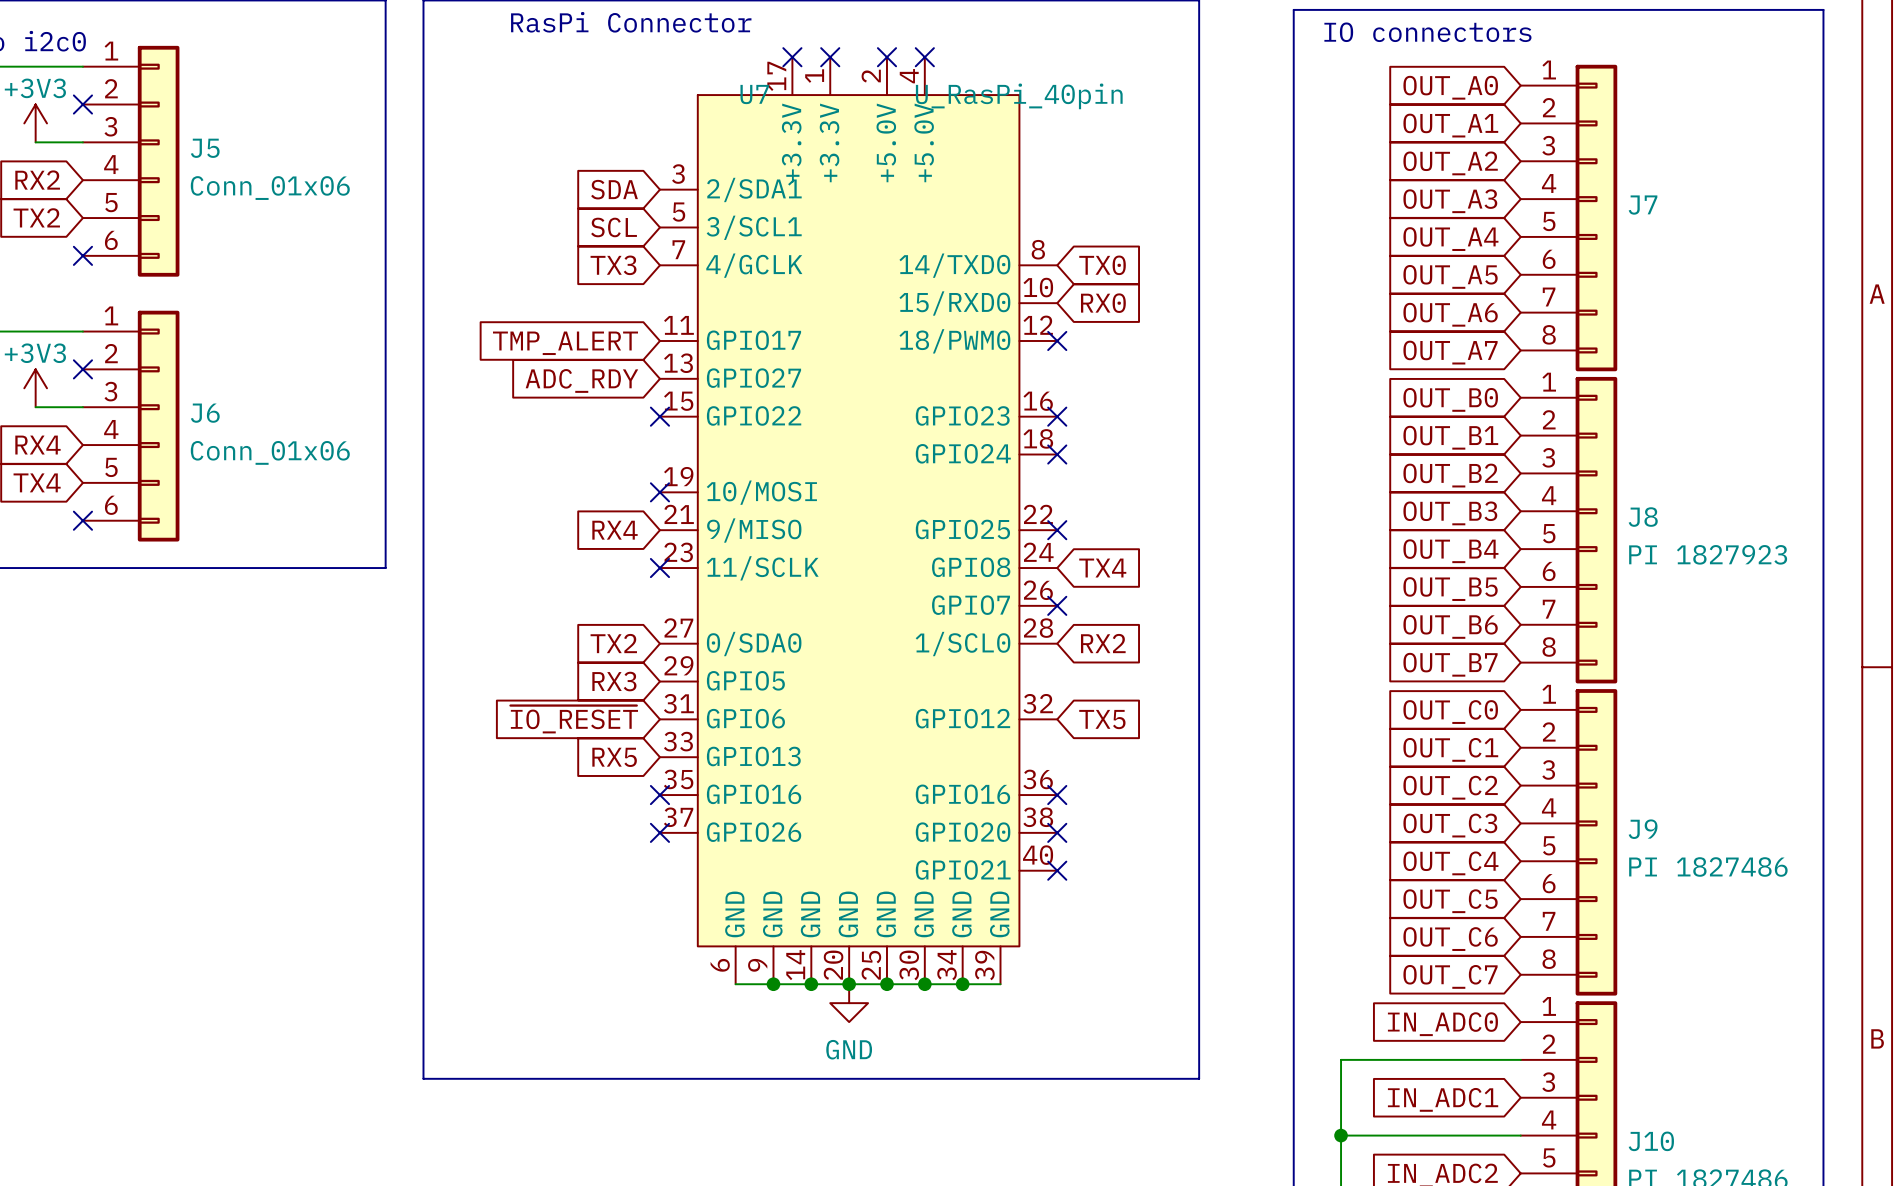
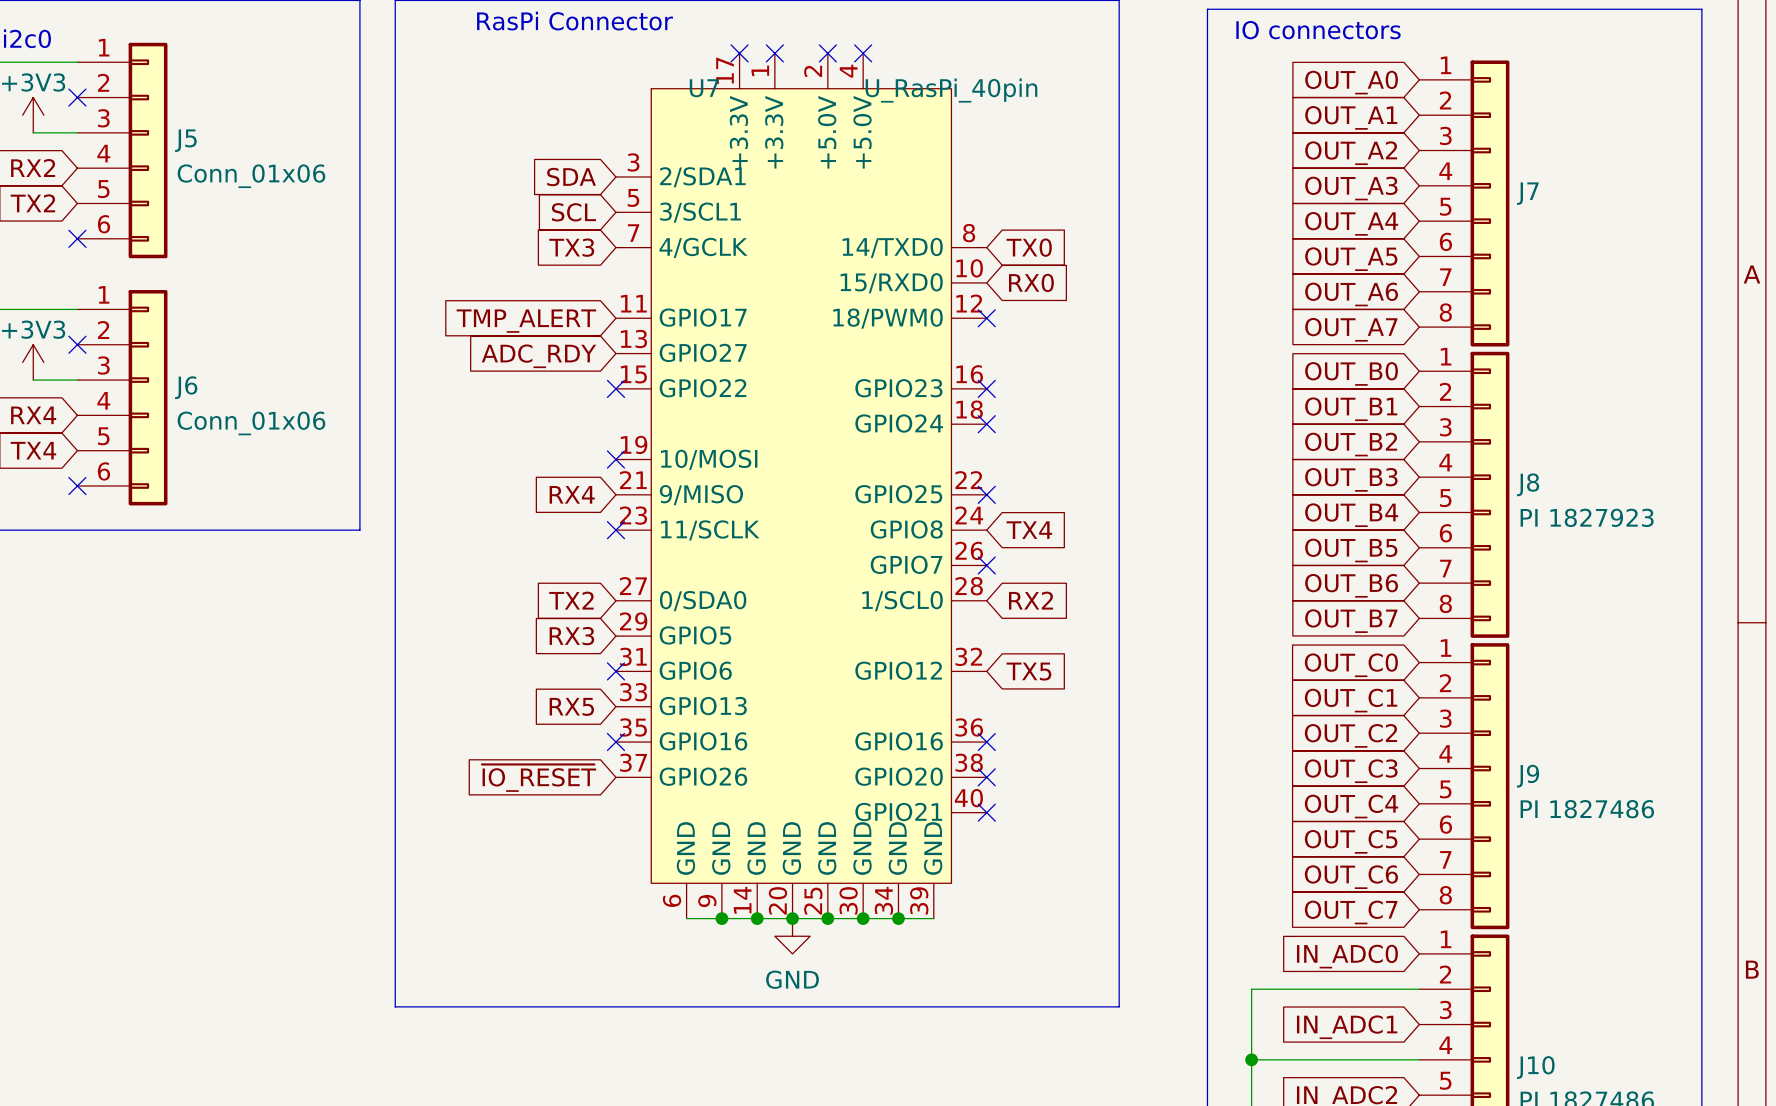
global label position: ~{IO_RESET} (574, 719) -> ~{IO_RESET} (539, 778)
no-connect mark: none -> (615, 671)
no-connect mark: (659, 832) -> none

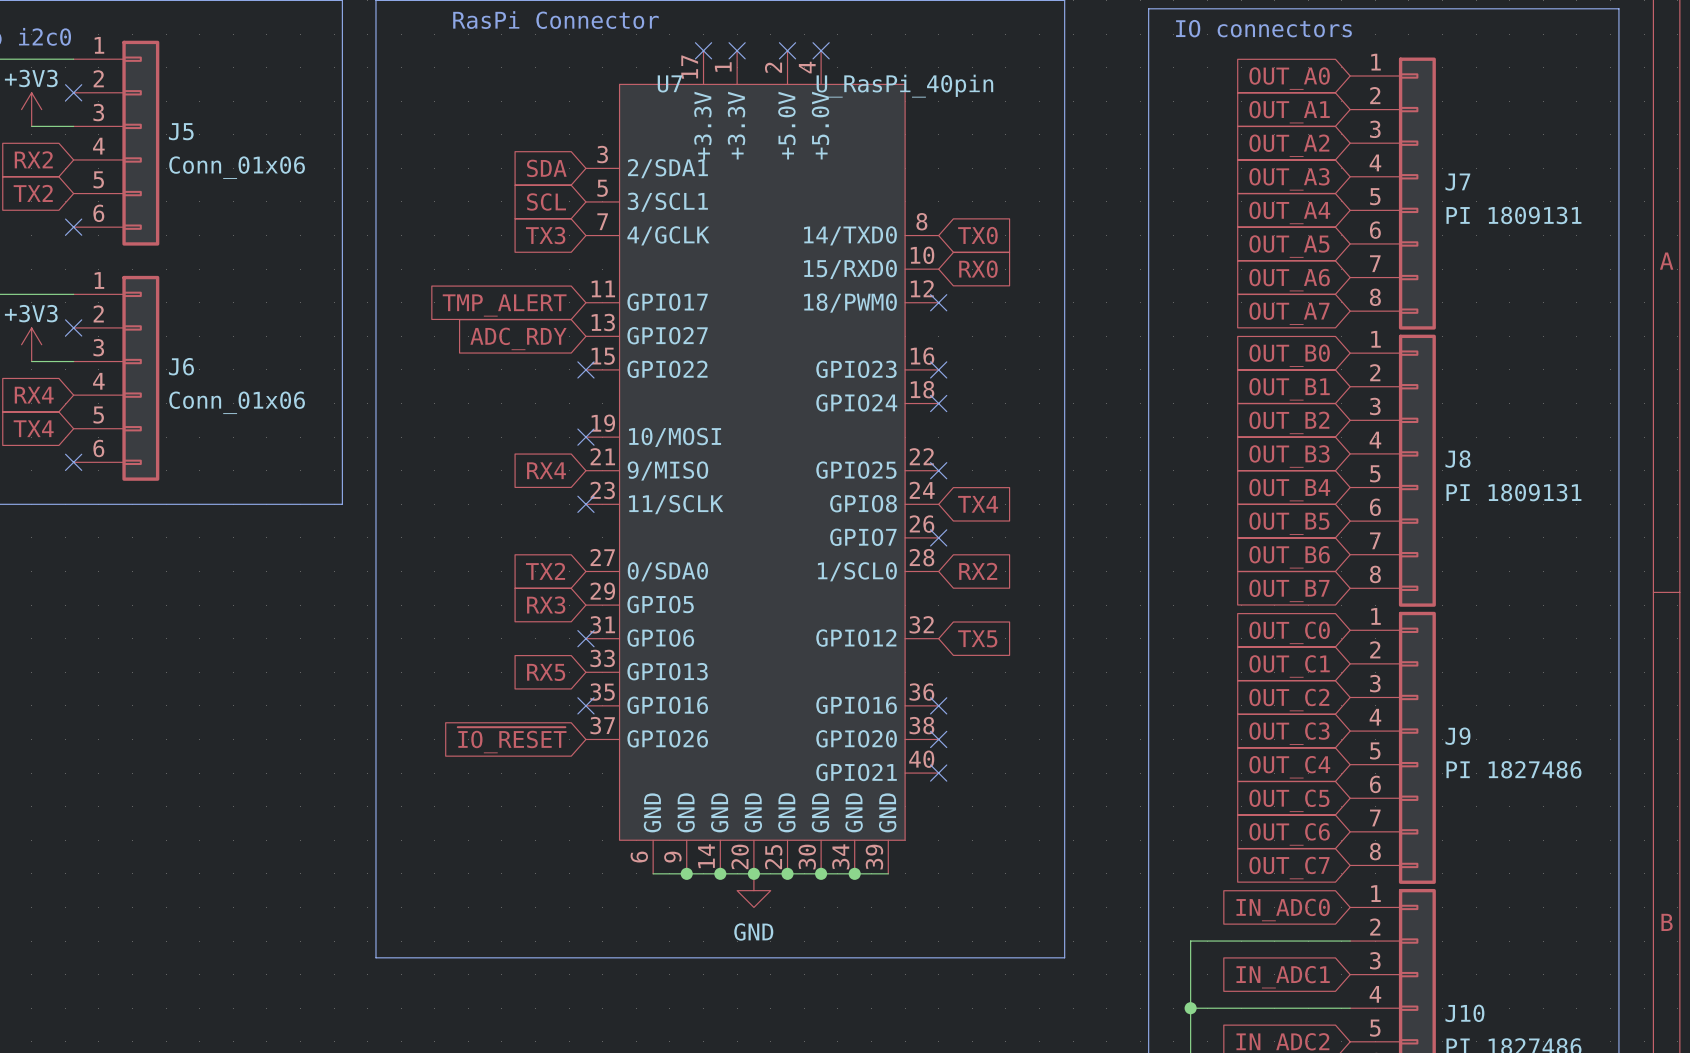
J7 value: none -> PI 1809131 (1513, 215)
J8 value: PI 1827923 (1587, 517) -> PI 1809131 (1513, 492)

